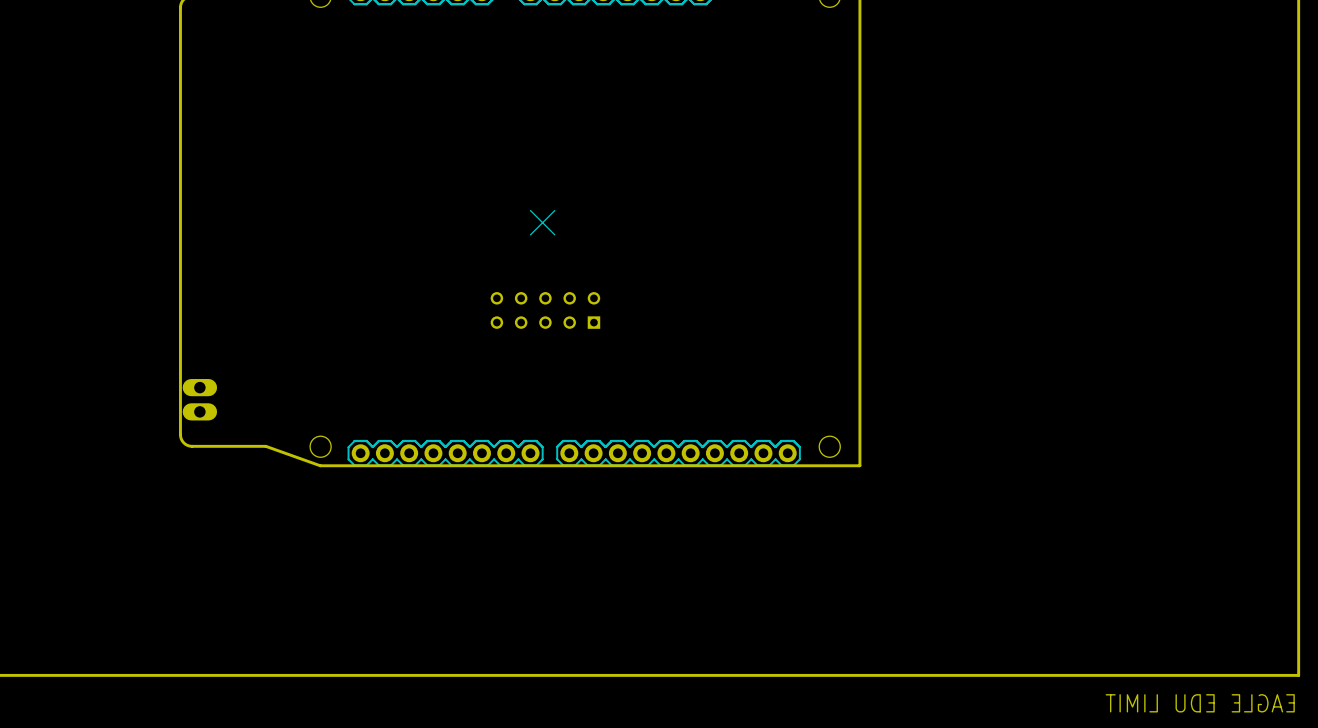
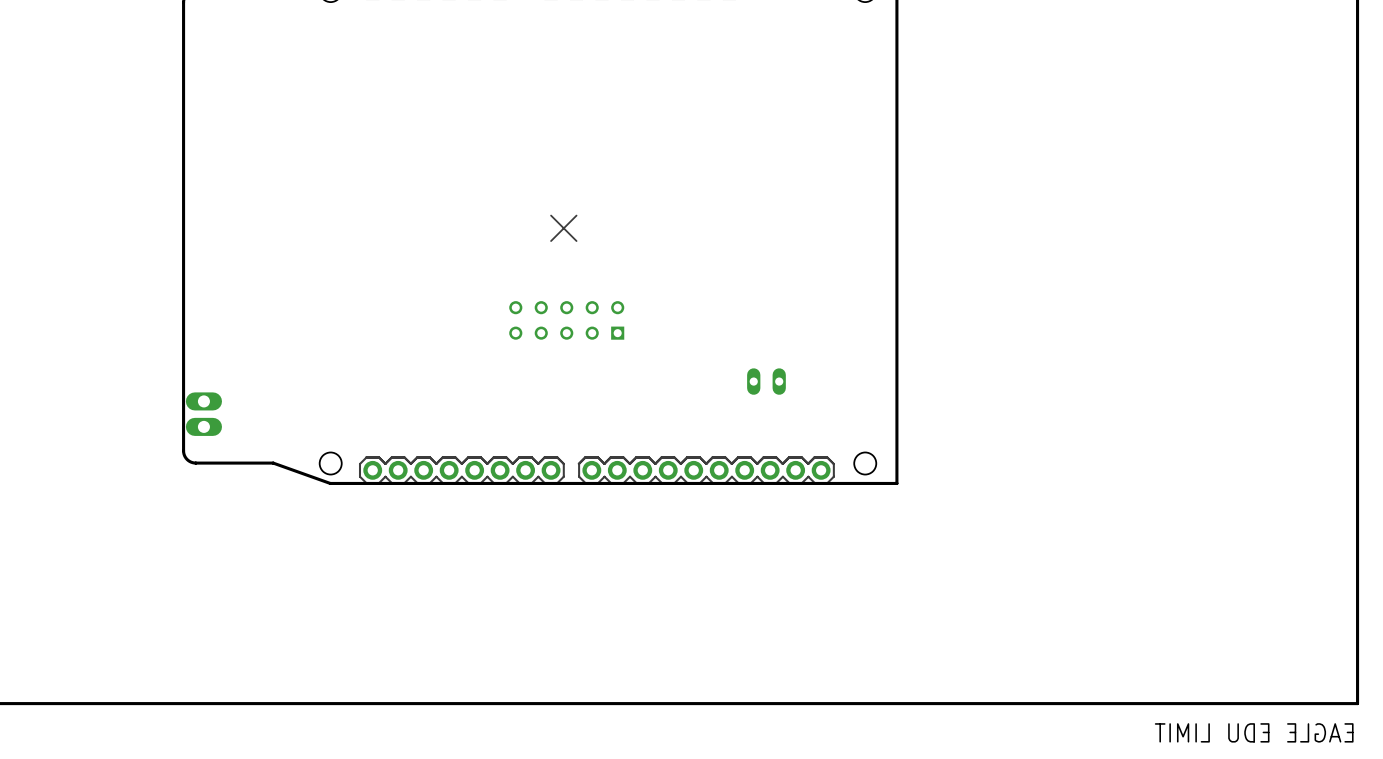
part: none -> (766, 381)

